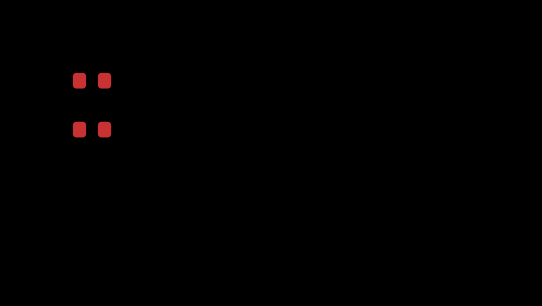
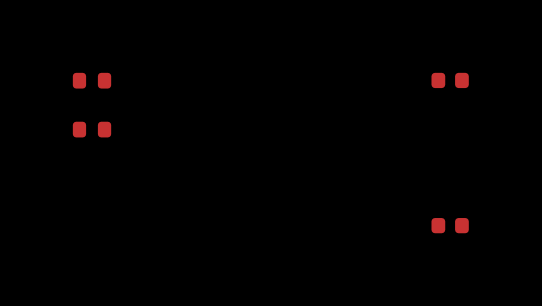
part: none -> (450, 80)
part: none -> (450, 225)

